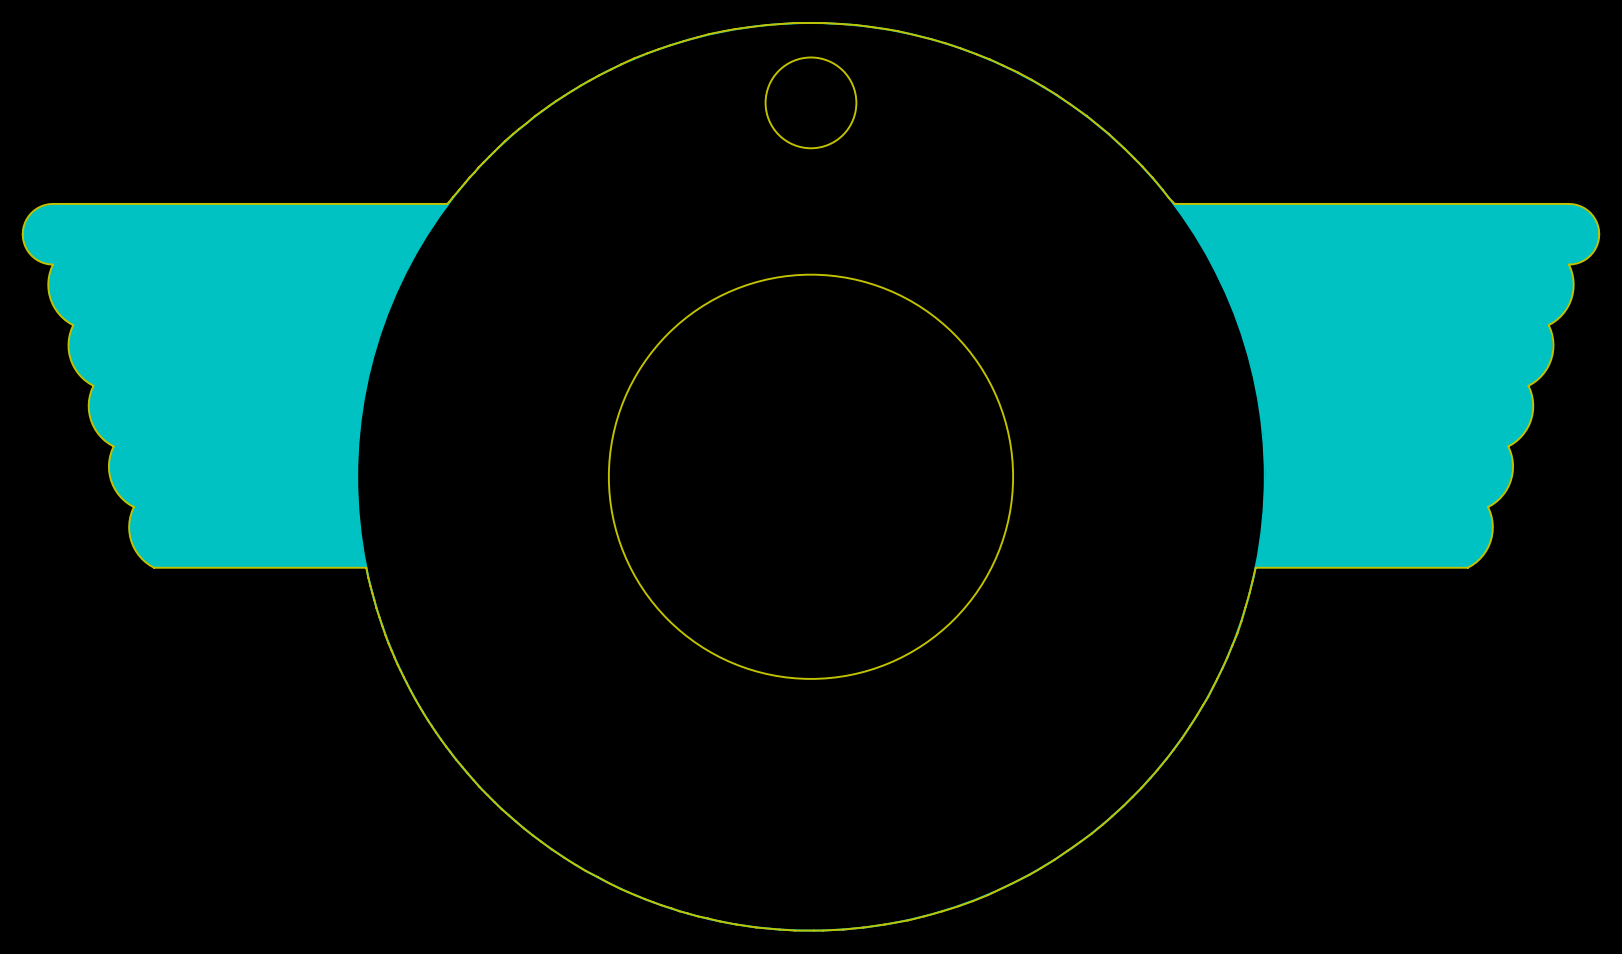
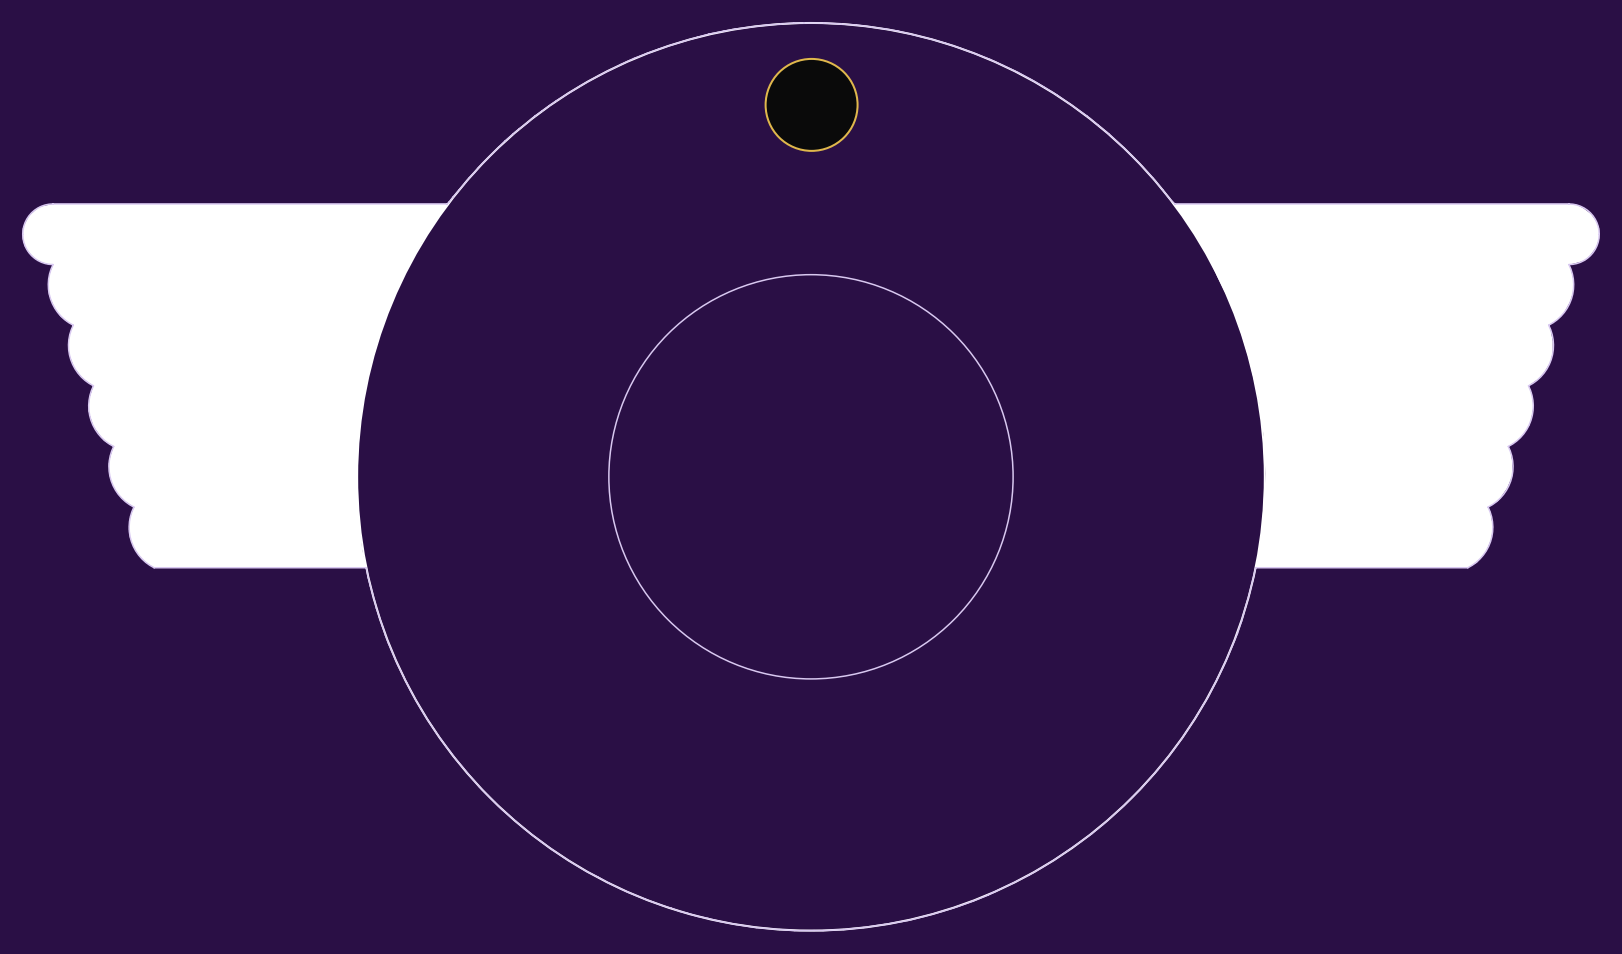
round board edge: [764, 56, 858, 150] -> none
part: none -> (811, 104)

